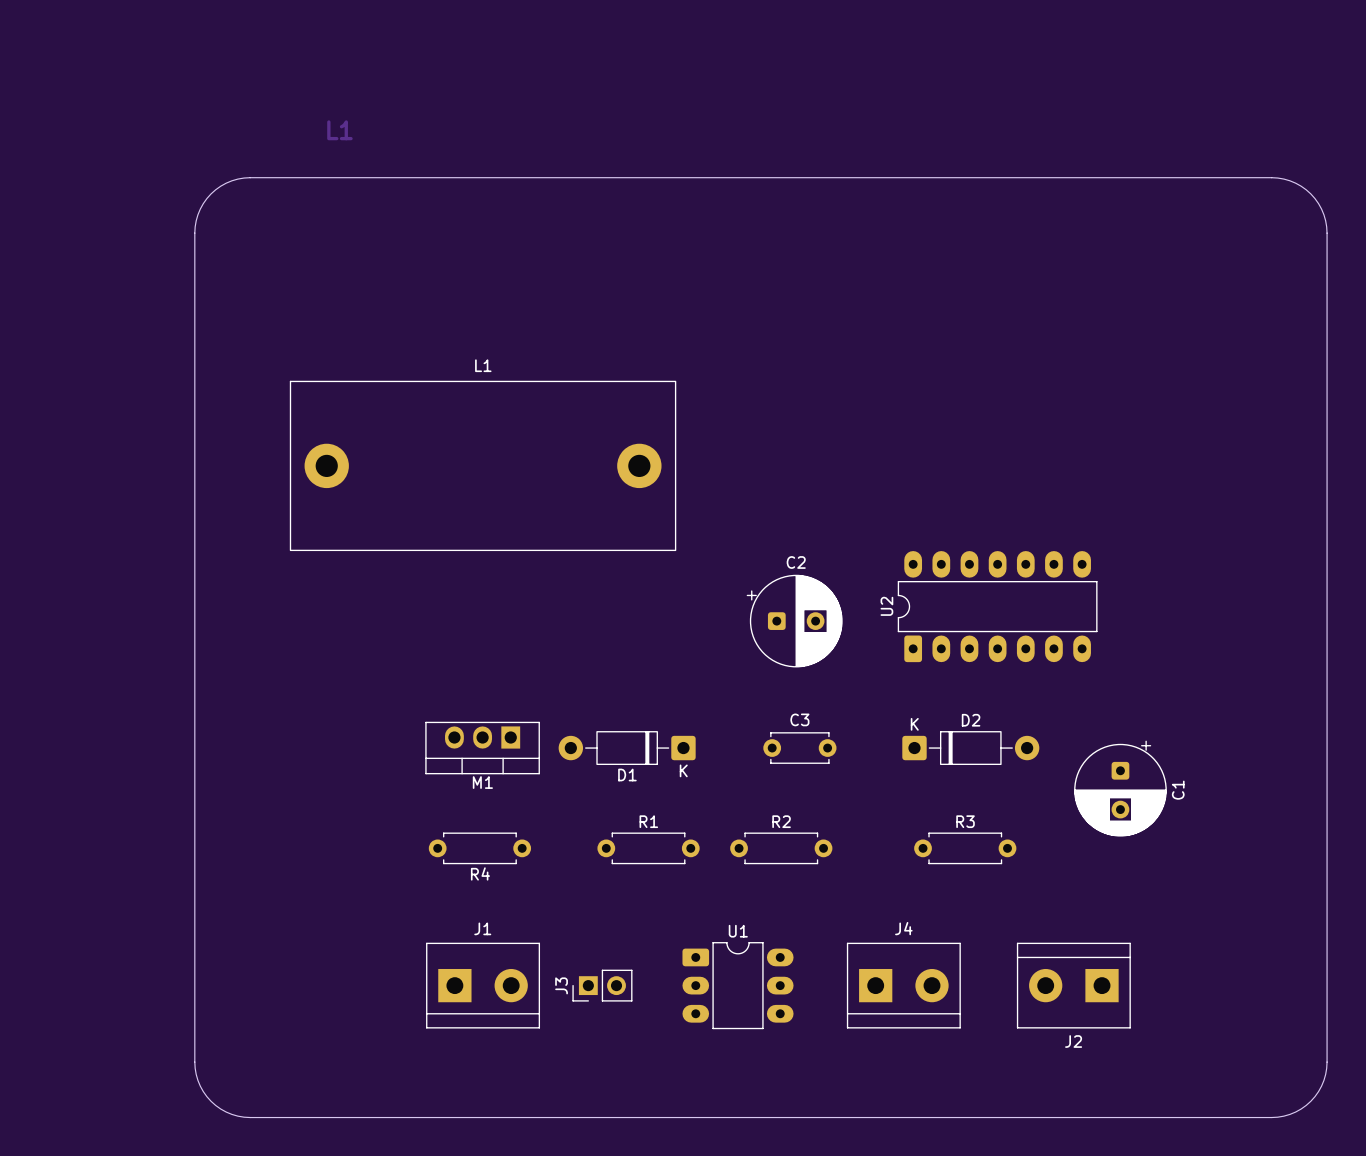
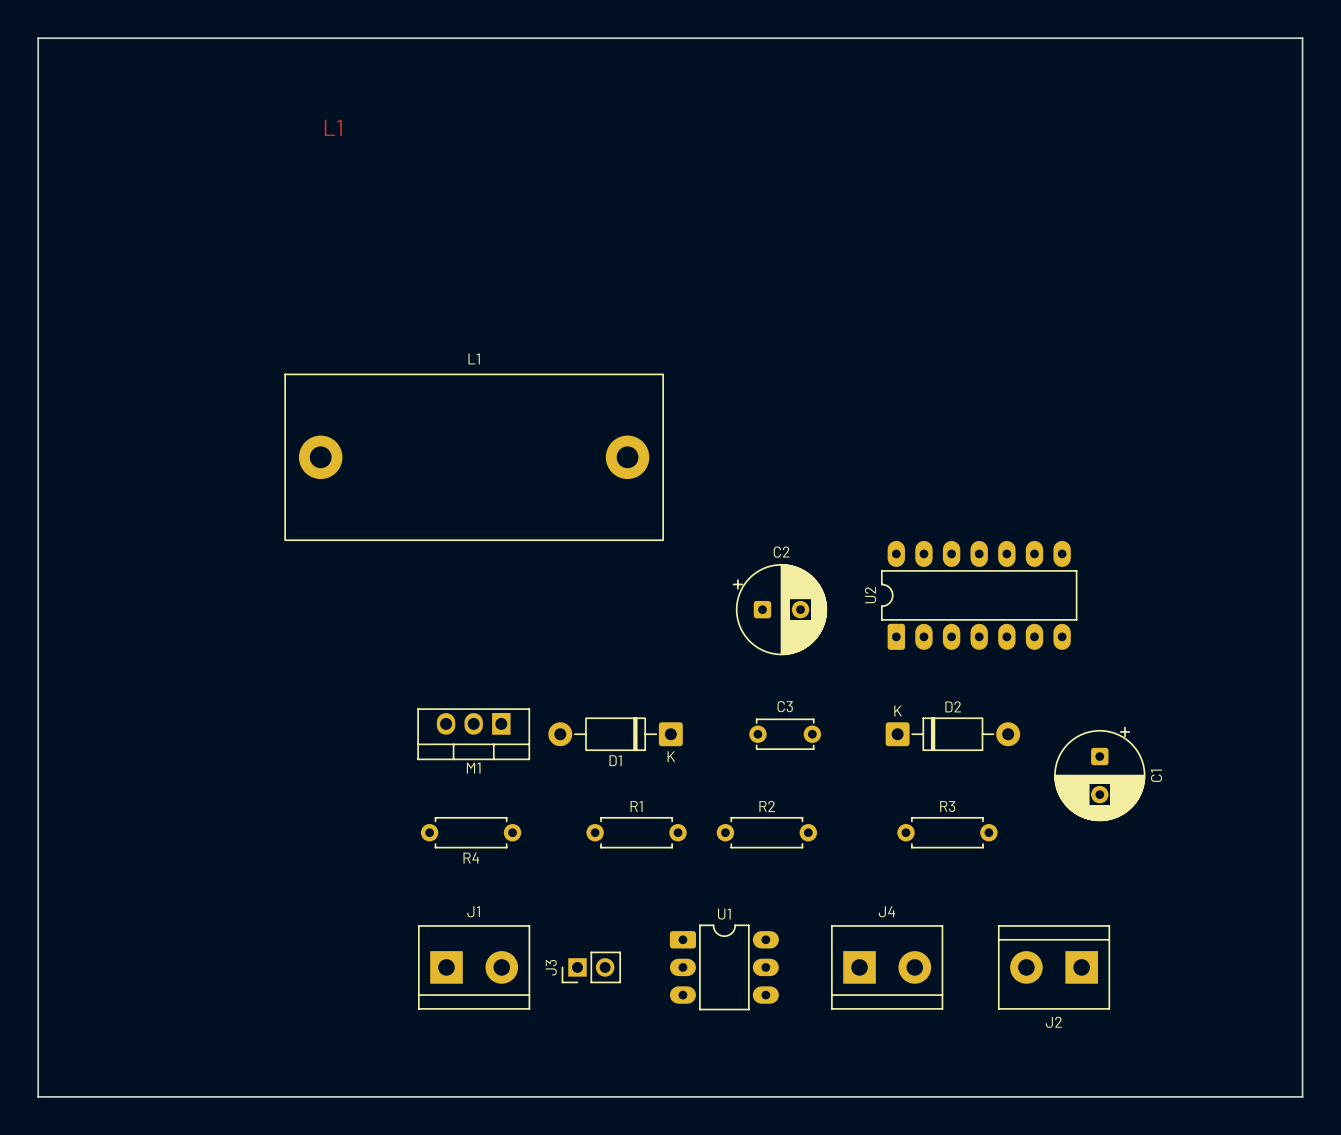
board edge: (1327, 233) (1323, 214) (1310, 193) (1295, 183) (1271, 177) (250, 177) (231, 180) (215, 189) (200, 209) (194, 233) (194, 1062) (200, 1086) (211, 1101) (231, 1114) (250, 1117) -> (1302, 228) (1302, 38) (38, 38) (38, 1096) (245, 1096)
board edge: (1327, 1062) (1323, 1080) (1310, 1101) (1295, 1112) (1271, 1117) -> (1302, 1042) (1302, 1096) (1248, 1096)

